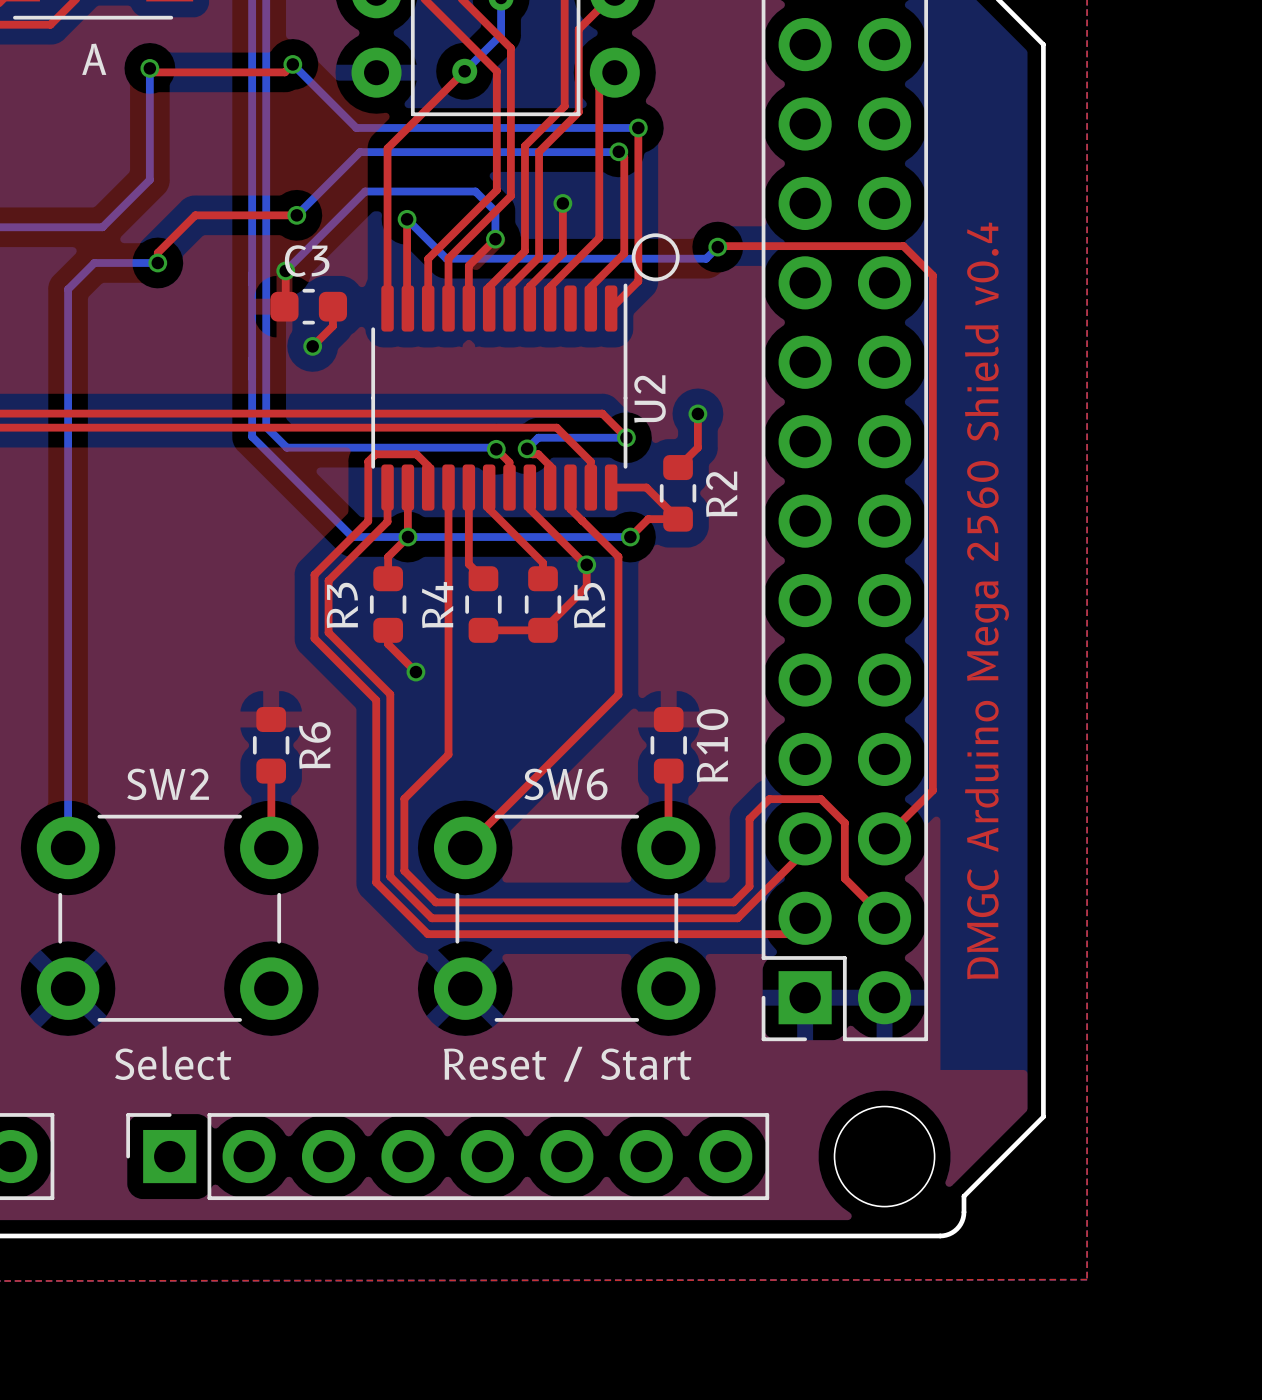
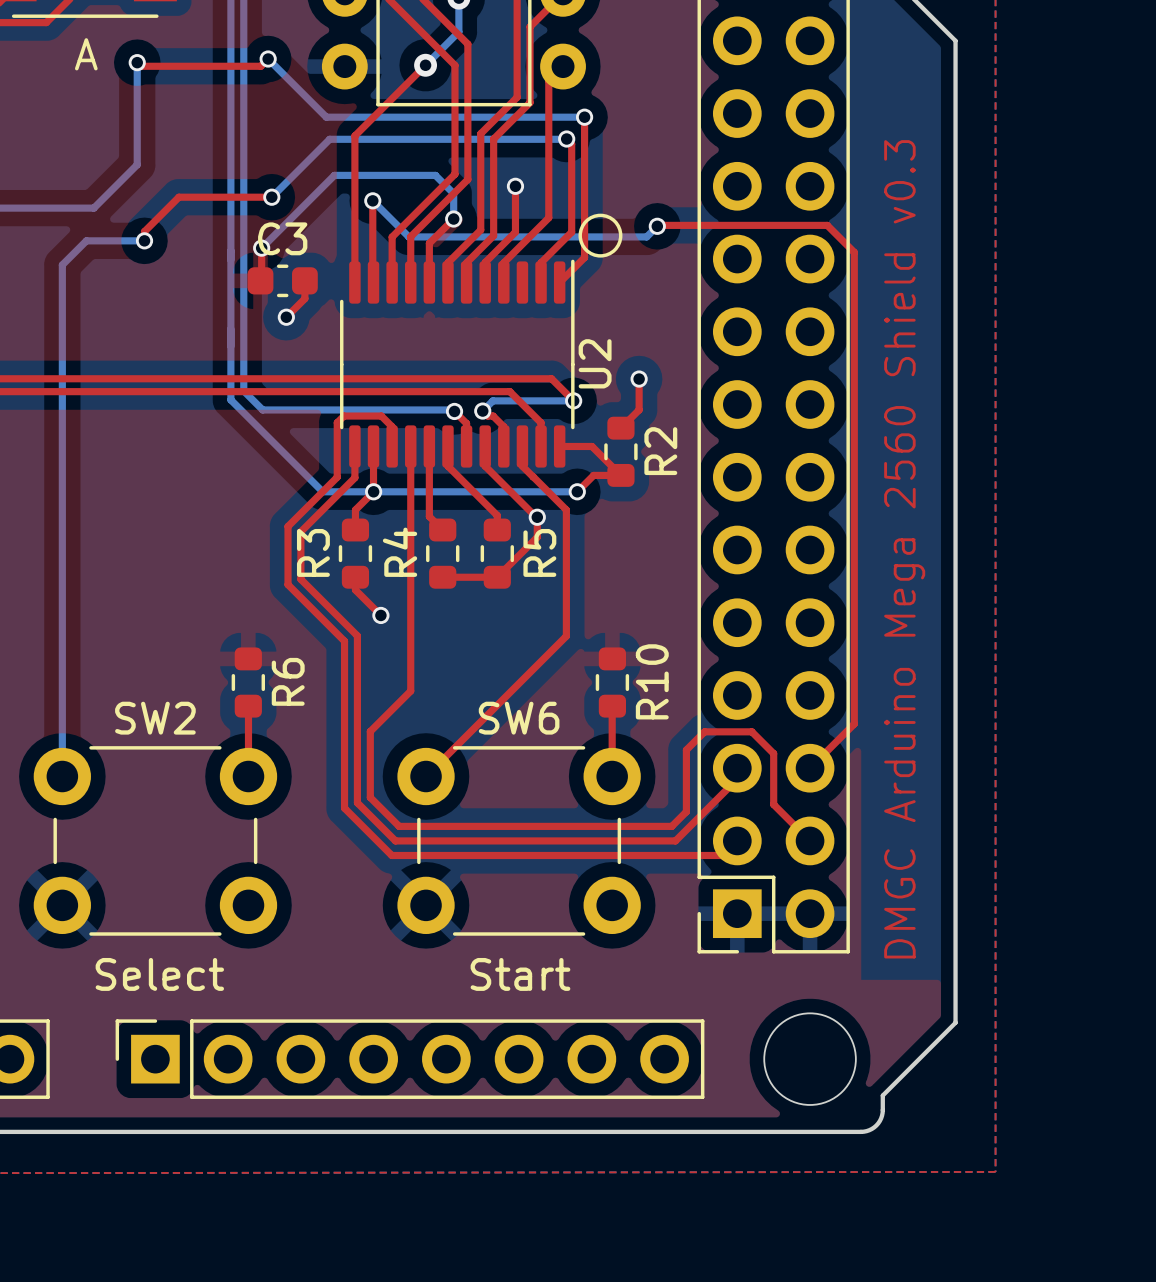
text: DMGC Arduino Mega 2560 Shield v0.4 (986, 600) -> DMGC Arduino Mega 2560 Shield v0.3 (904, 549)
text: Reset / Start (567, 1064) -> Start (520, 974)

